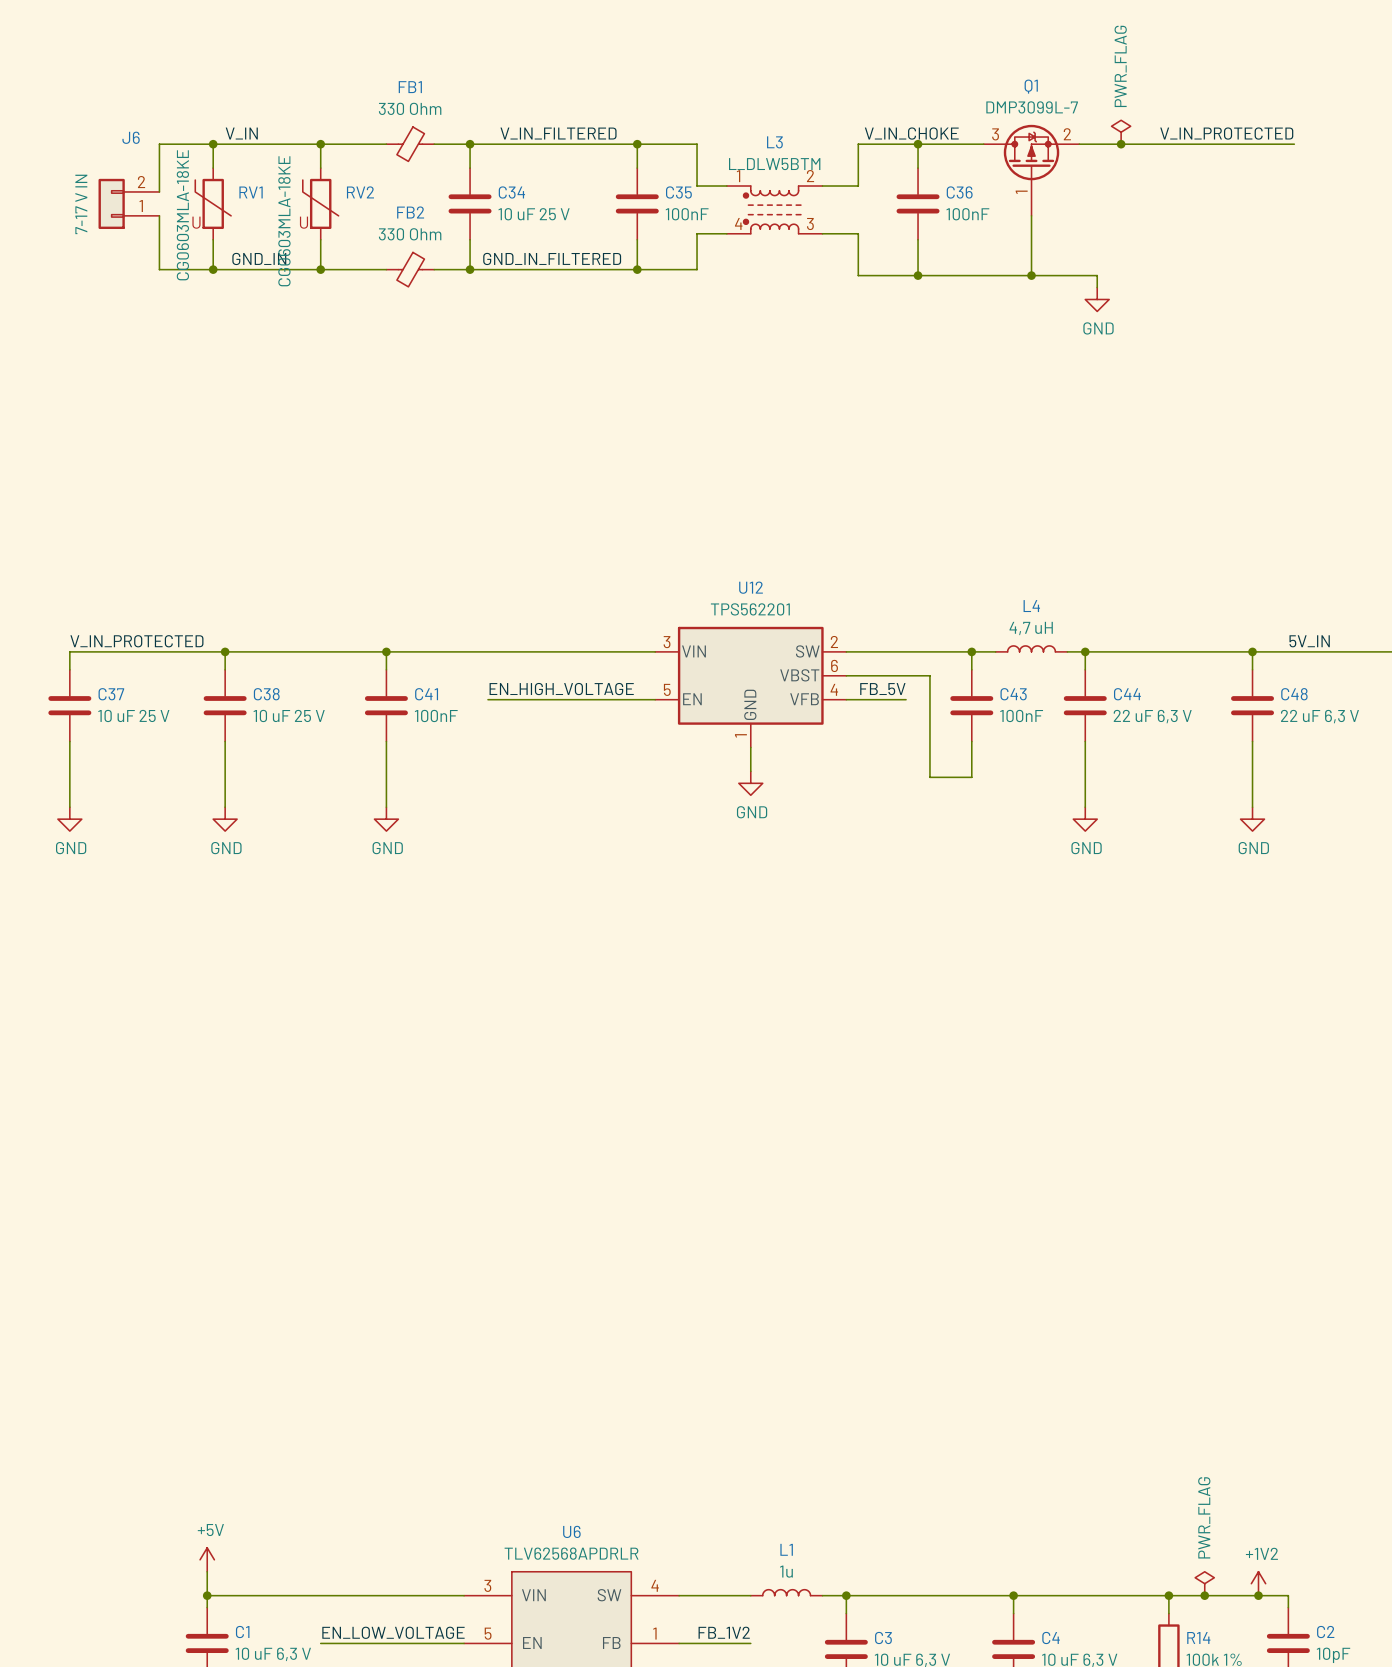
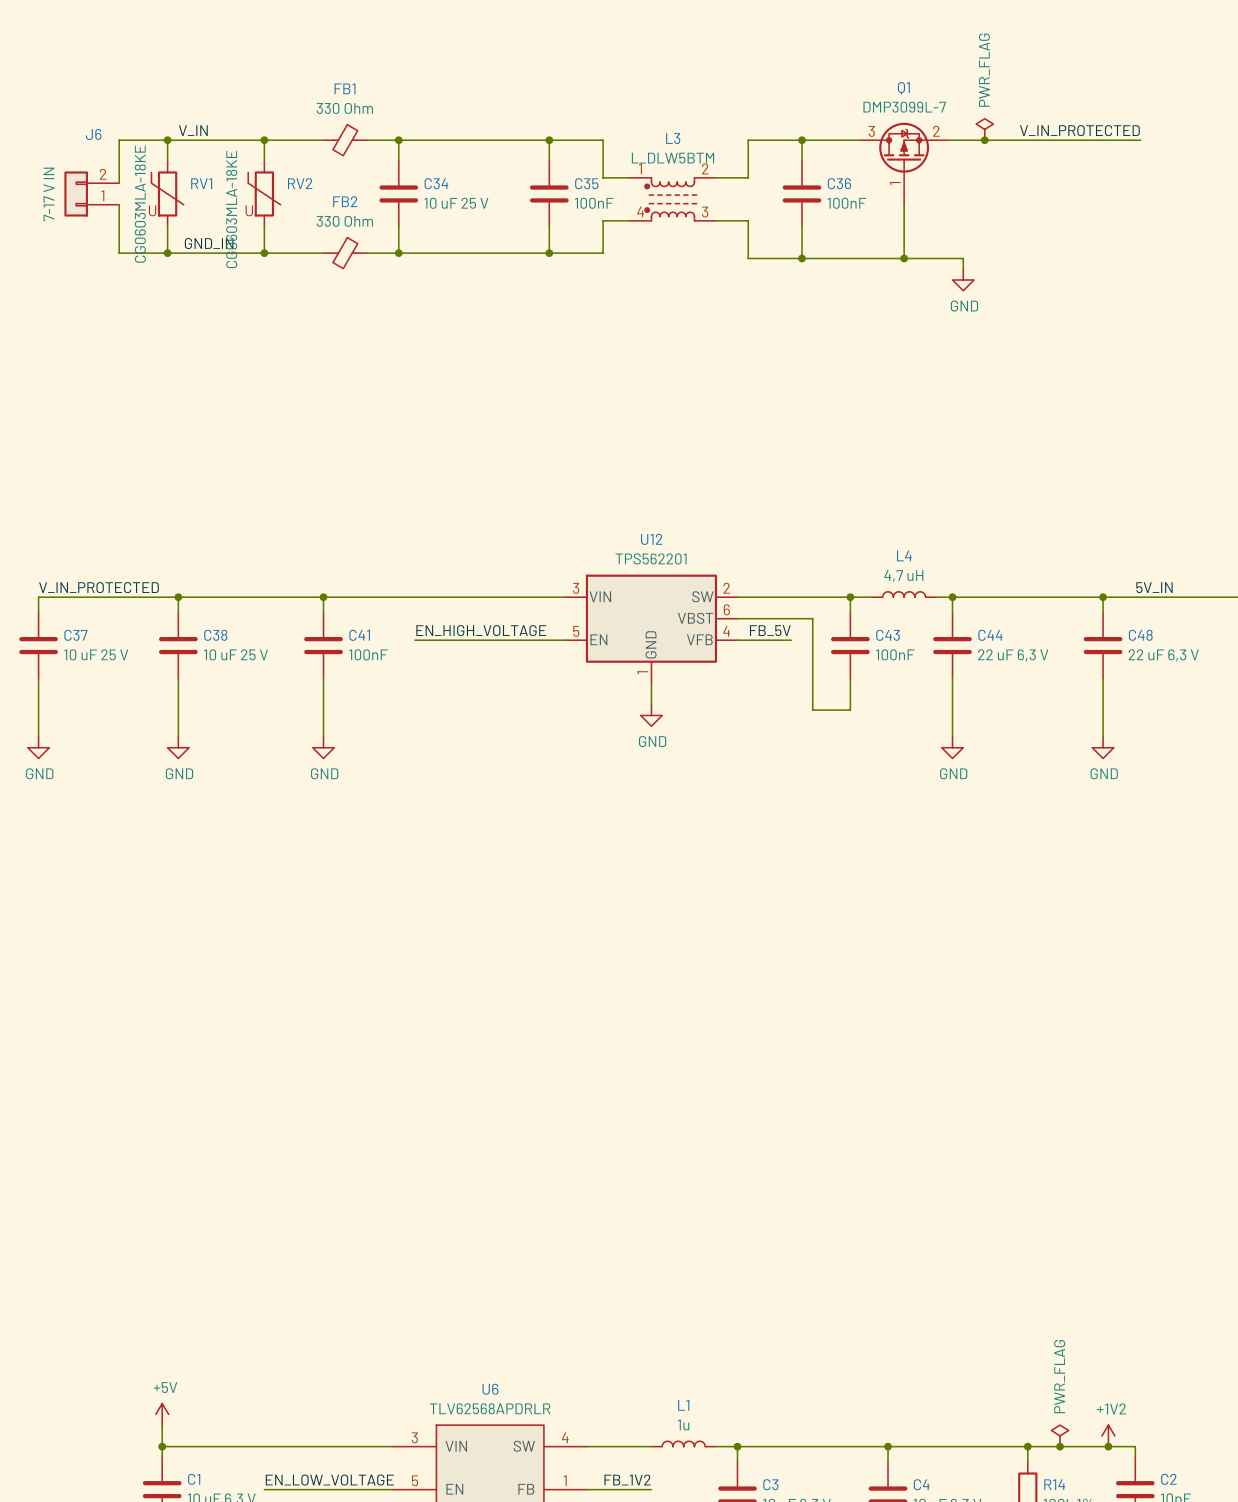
label: V_IN_FILTERED (558, 133) -> none
label: V_IN_CHOKE (911, 133) -> none
label: GND_IN_FILTERED (552, 258) -> none

